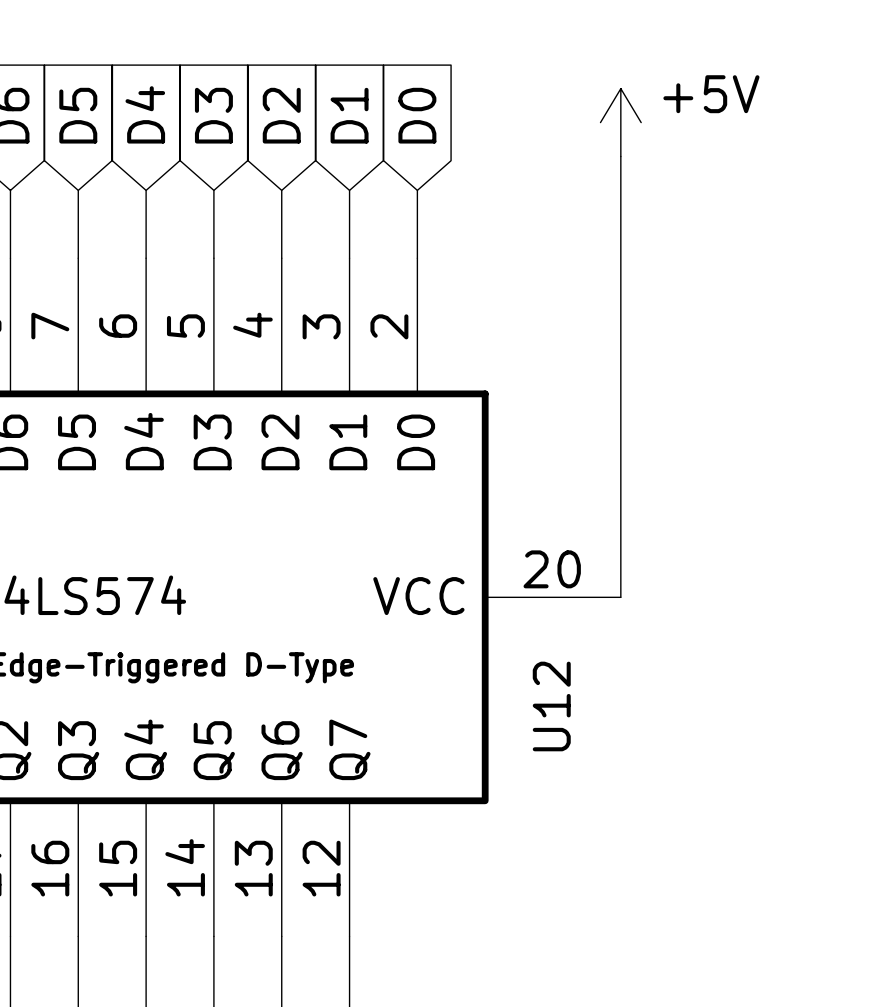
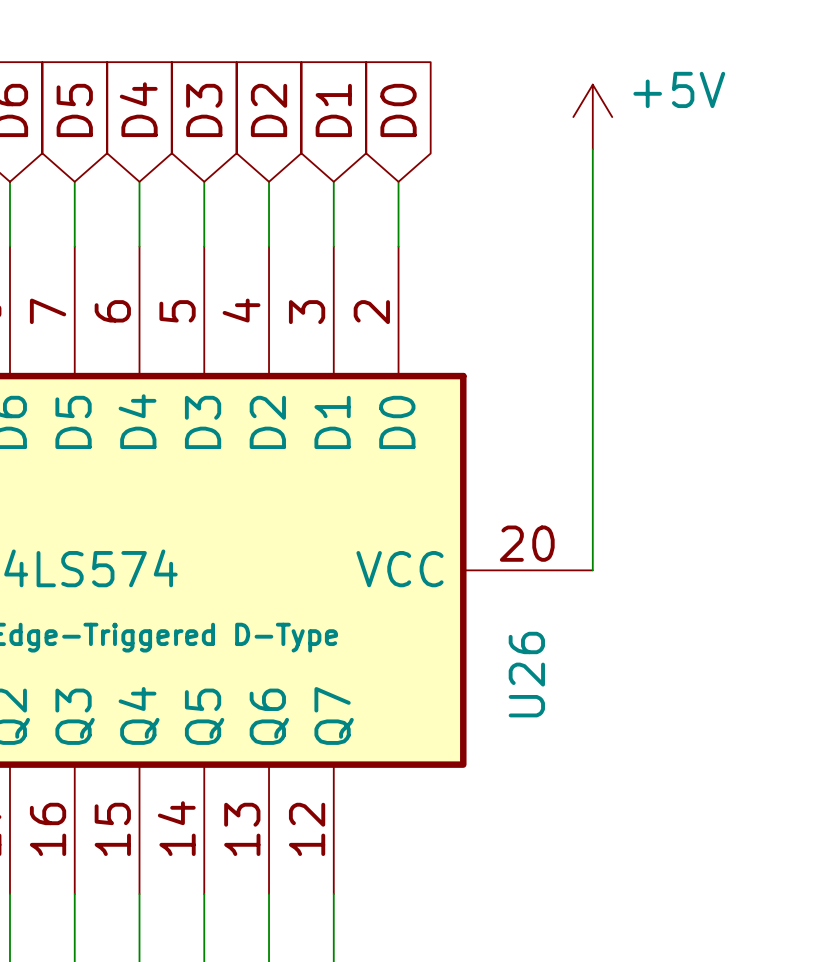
U12 name: U12 (551, 706) -> U26 (526, 674)

